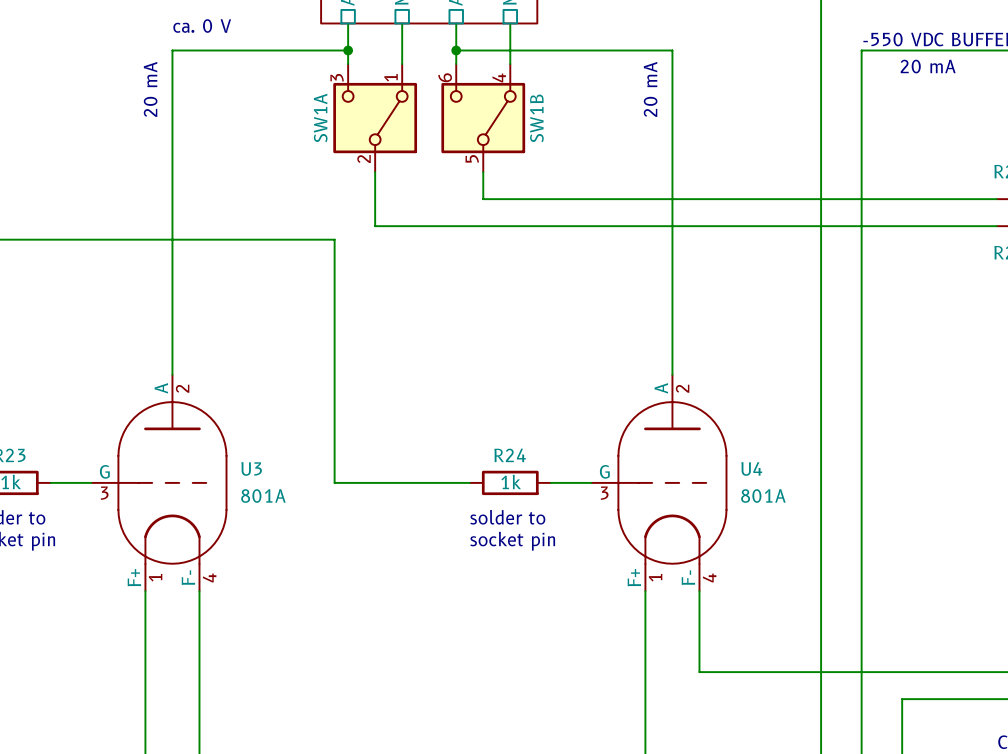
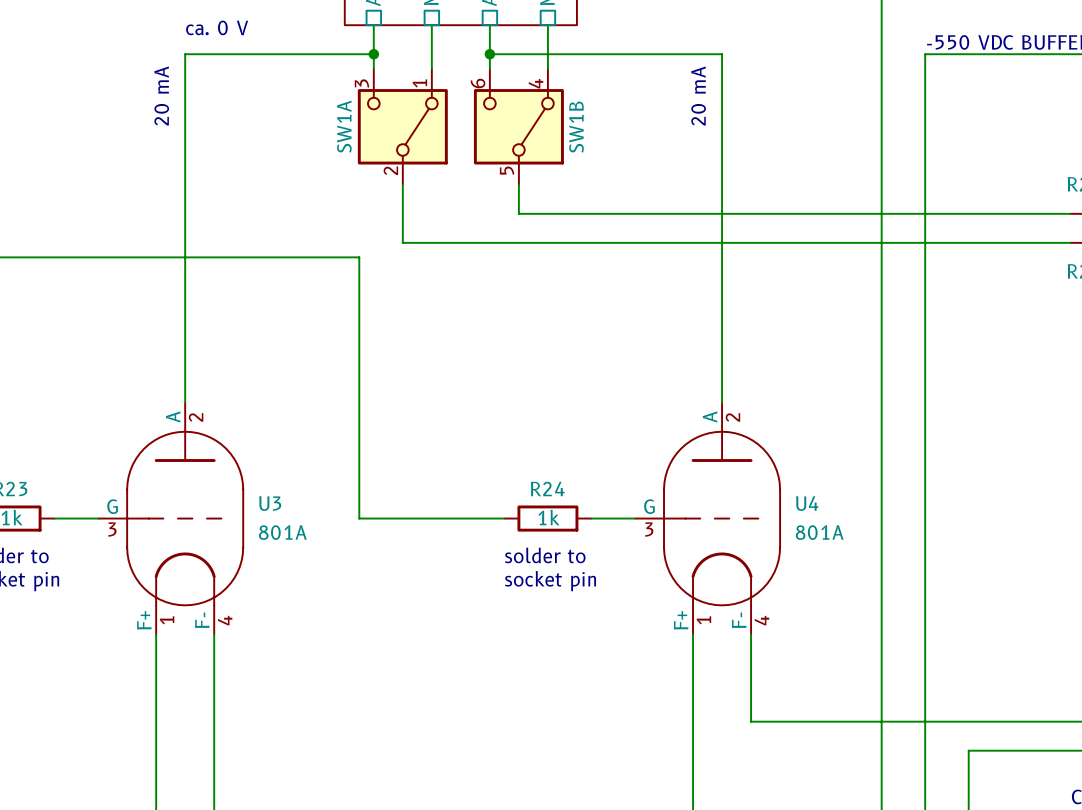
text: 20 mA (928, 66) -> none

